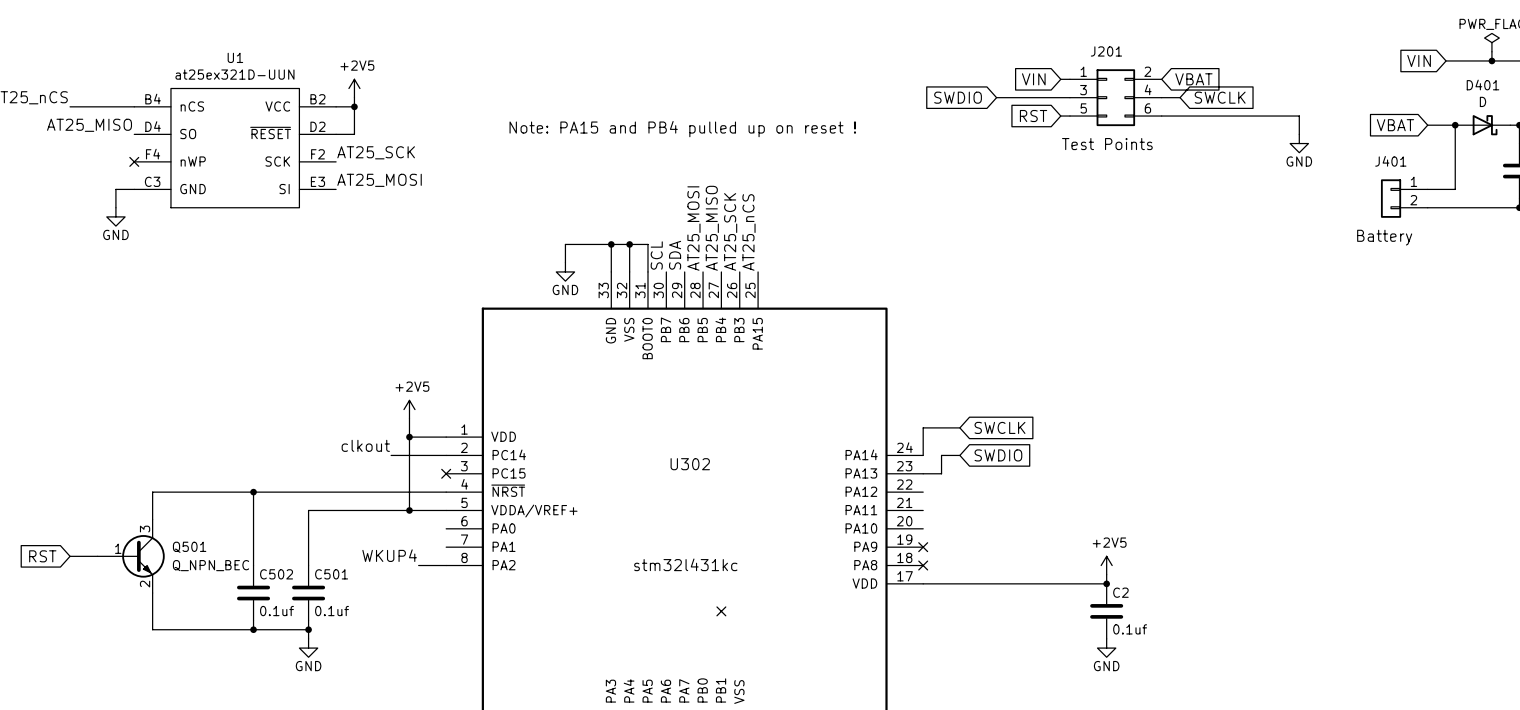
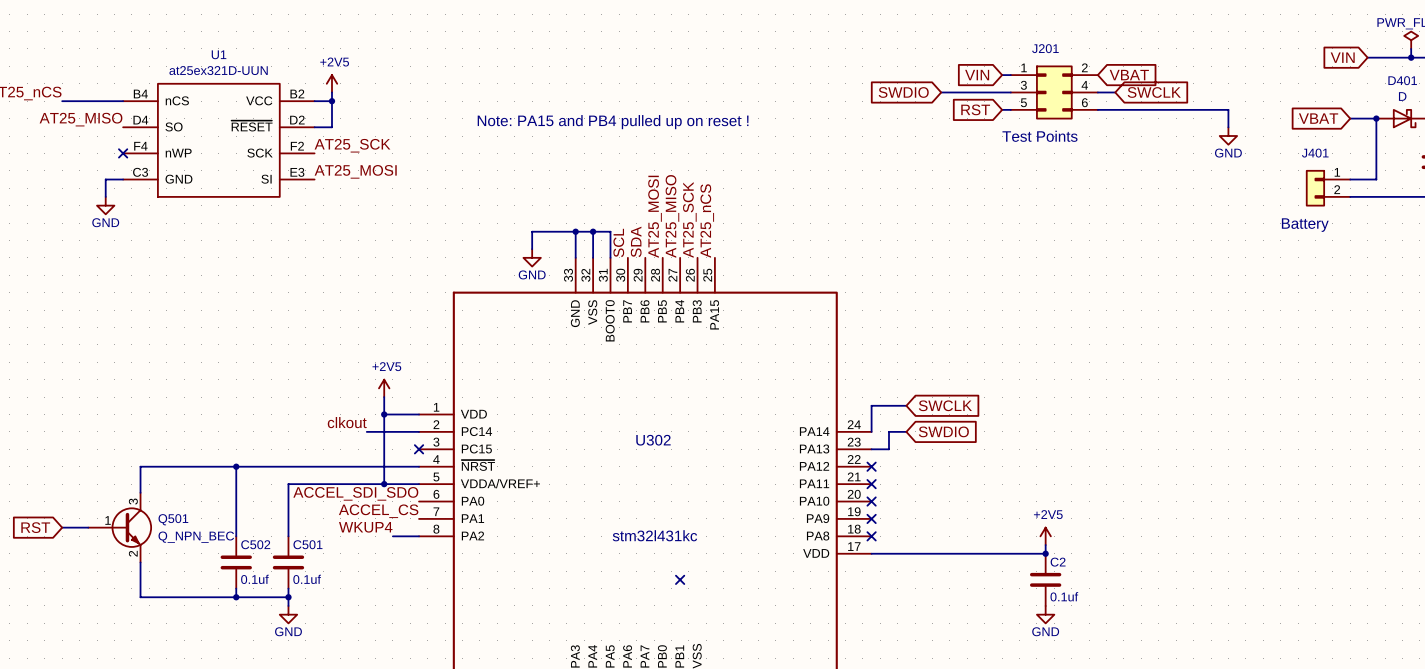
no-connect mark: none -> (871, 466)
no-connect mark: none -> (871, 484)
label: none -> ACCEL_SDI_SDO (355, 493)
no-connect mark: none -> (871, 501)
label: none -> ACCEL_CS (378, 511)

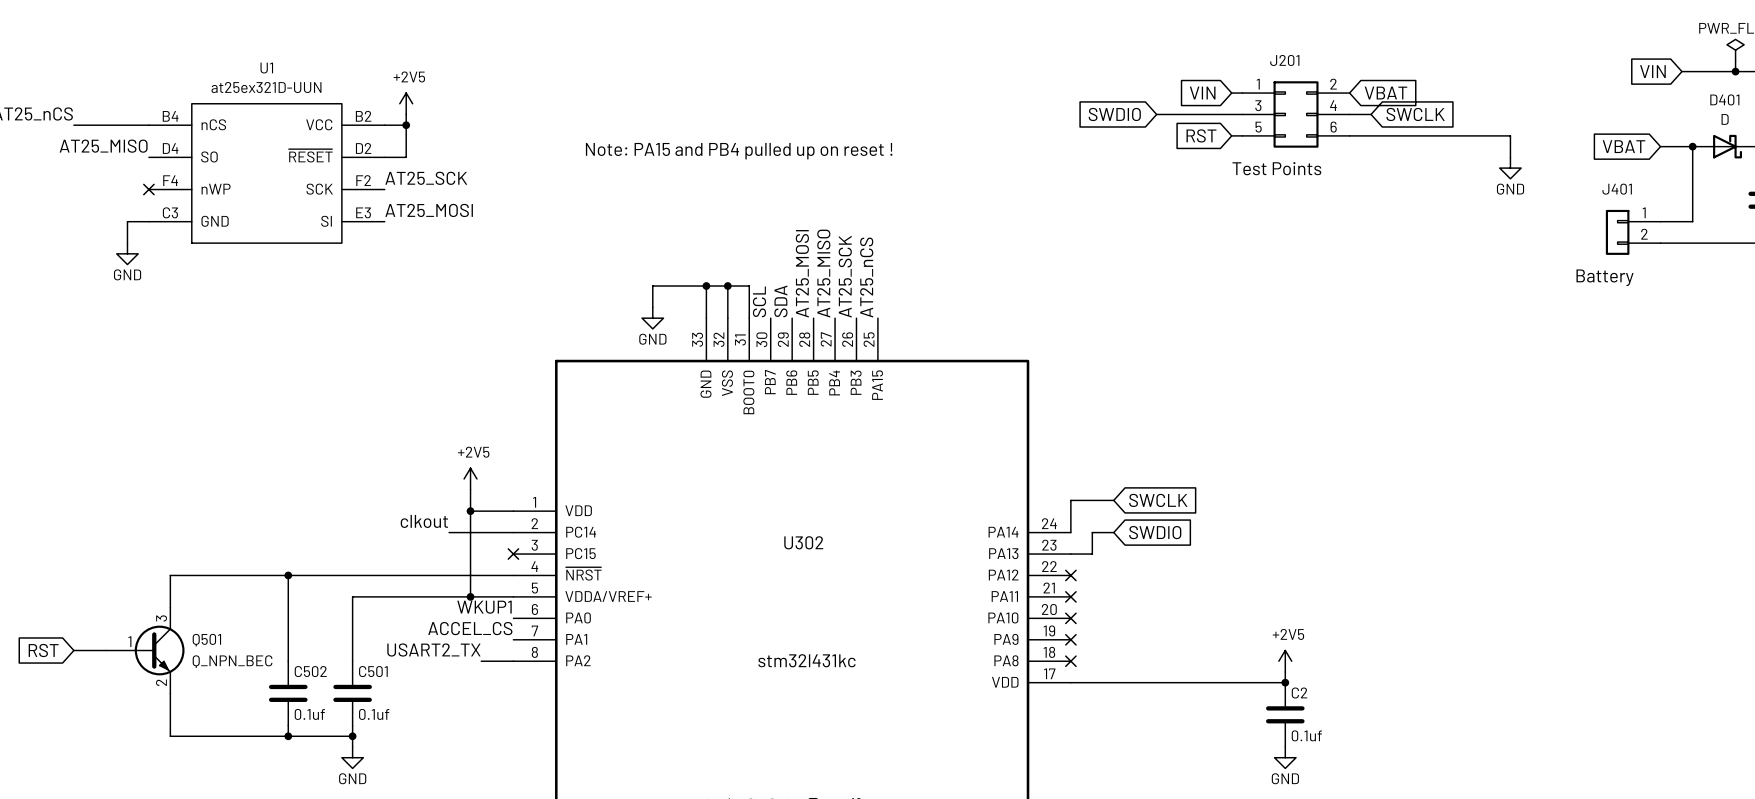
label: ACCEL_SDI_SDO (355, 493) -> WKUP1 (484, 607)
label: WKUP4 (365, 527) -> USART2_TX (433, 650)
no-connect mark: (680, 579) -> none

